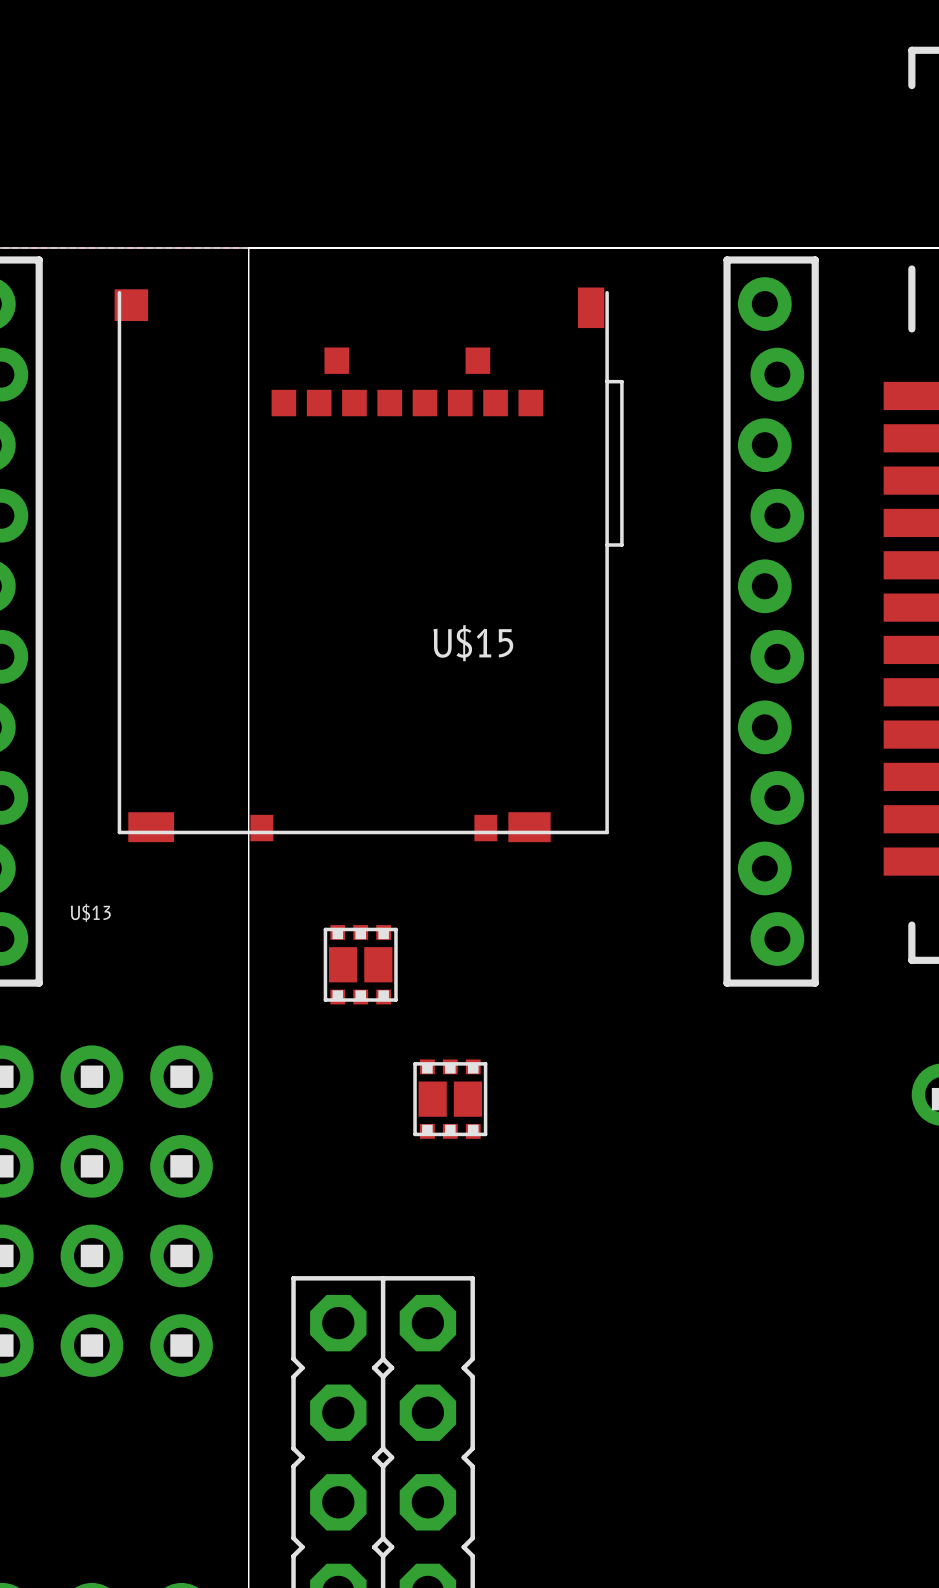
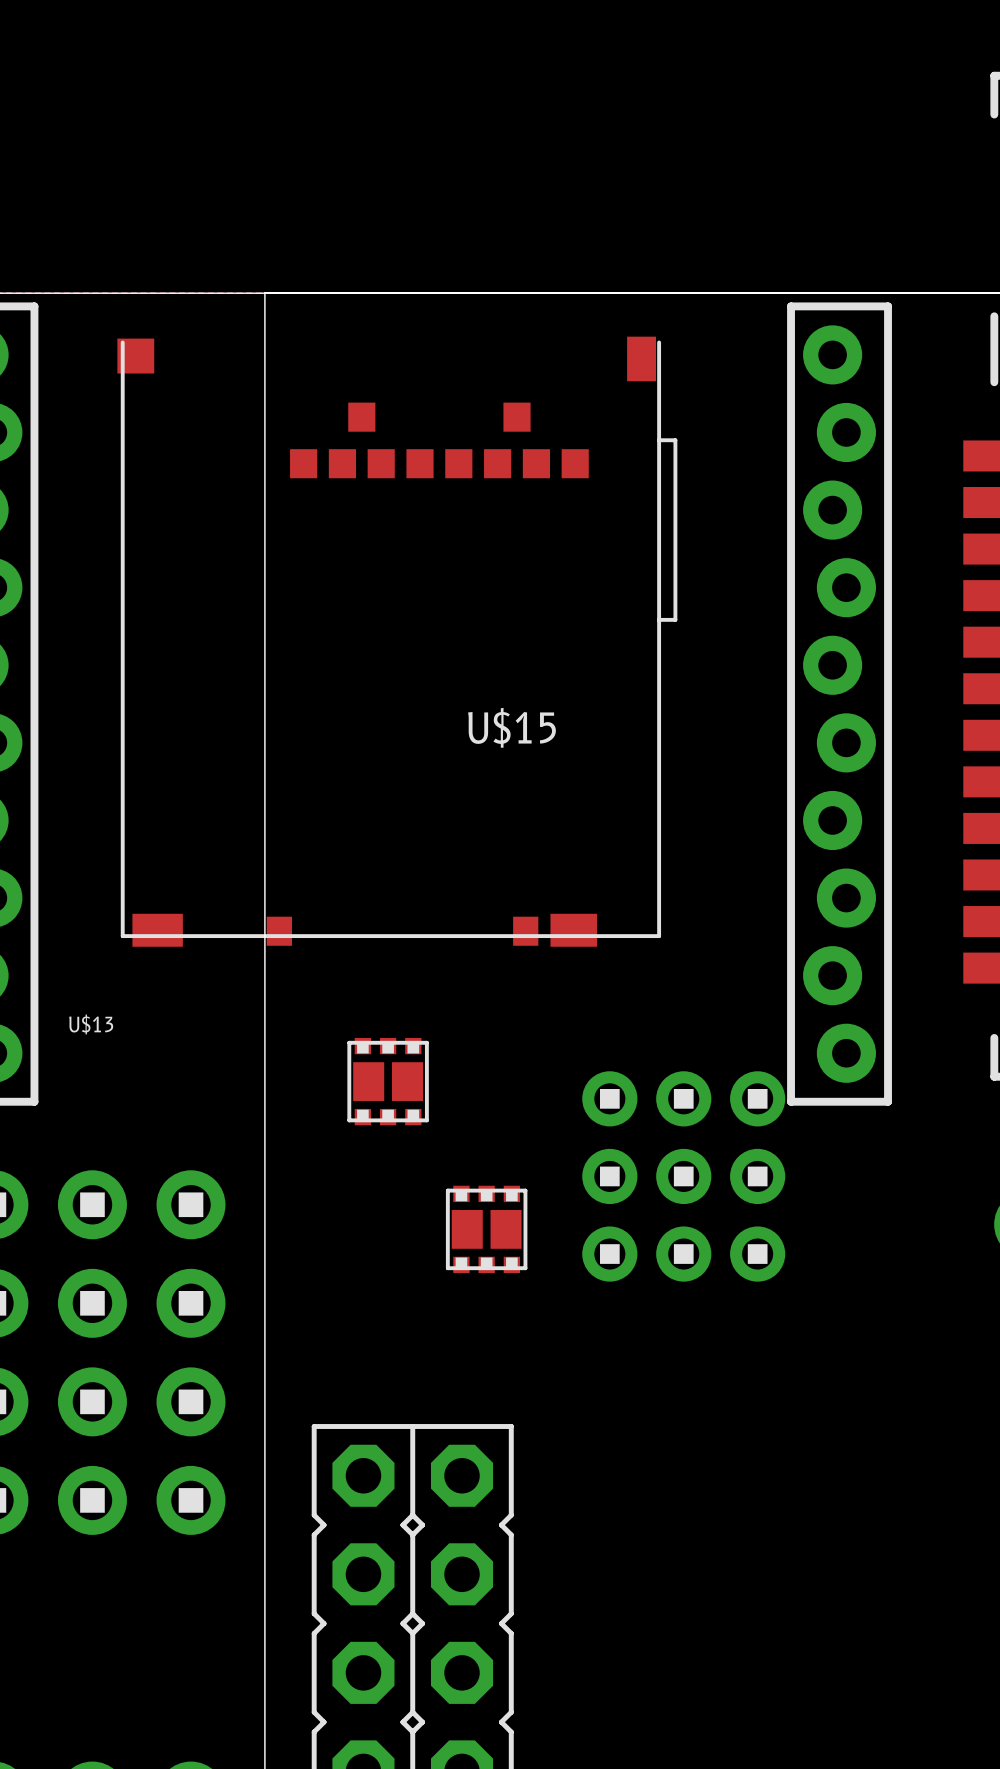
part: none -> (609, 1176)
part: none -> (683, 1176)
part: none -> (757, 1176)

